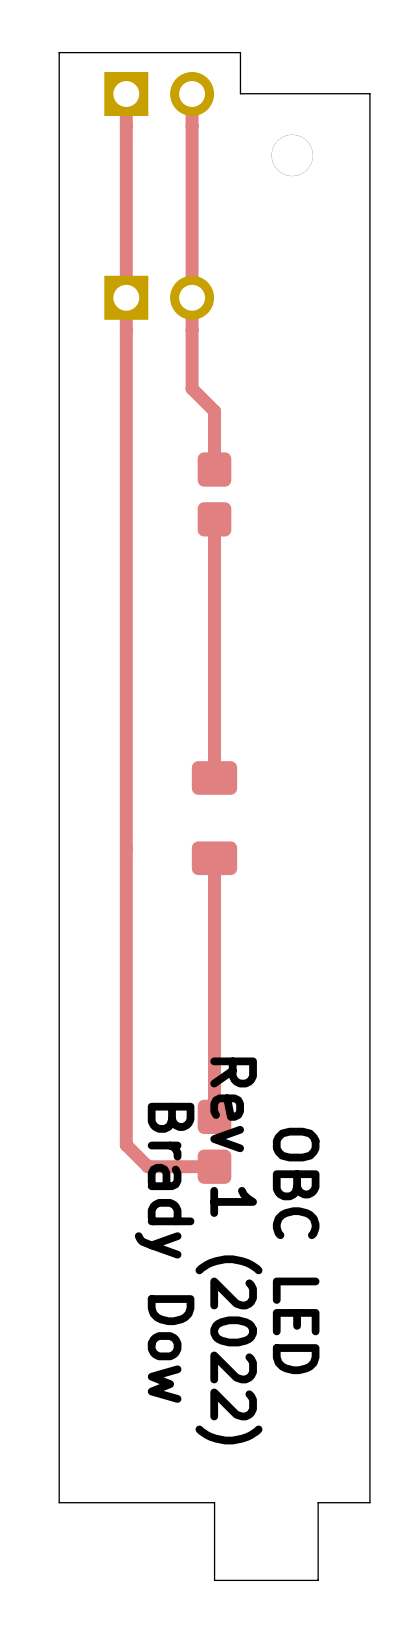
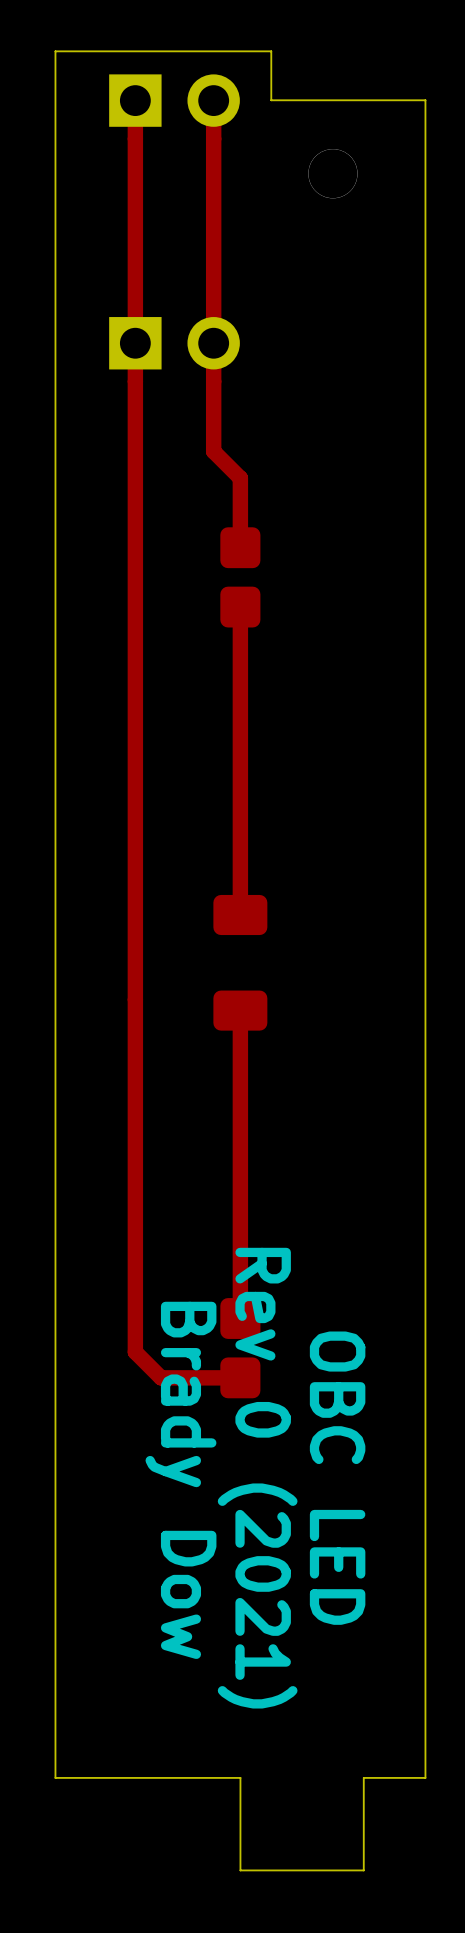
text: Rev 1 (2022) (229, 1250) -> Rev 0 (2021) (257, 1478)

